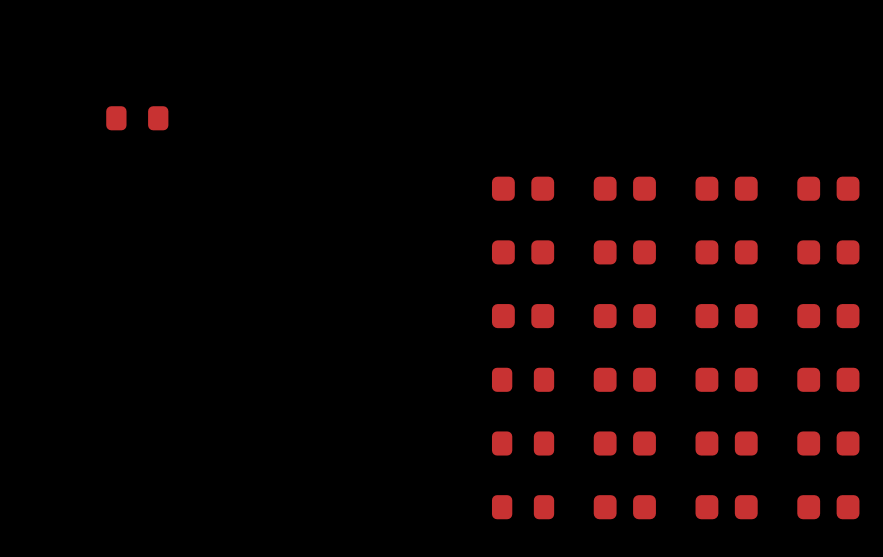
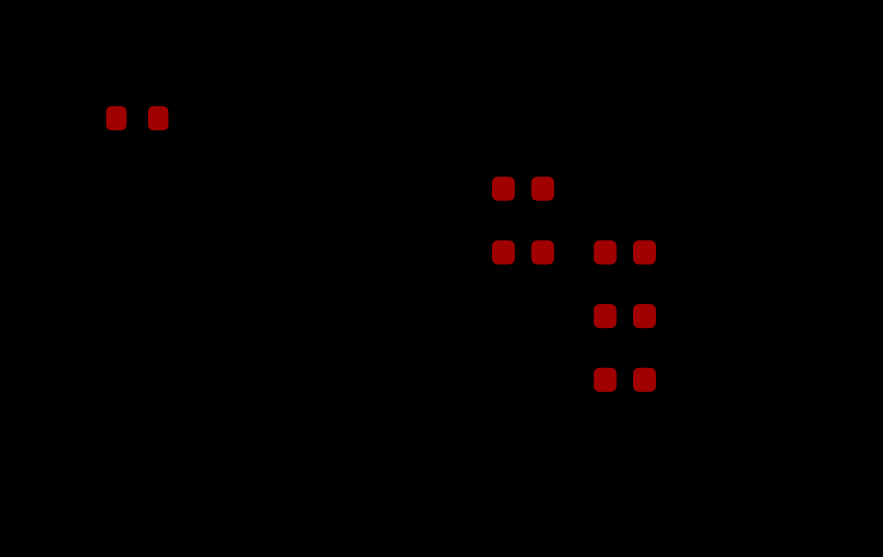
part: (624, 188) -> none
part: (726, 188) -> none
part: (828, 188) -> none
part: (726, 252) -> none
part: (828, 252) -> none
part: (523, 316) -> none
part: (726, 316) -> none
part: (828, 316) -> none
part: (523, 379) -> none
part: (726, 379) -> none
part: (828, 379) -> none
part: (523, 443) -> none
part: (624, 443) -> none
part: (726, 443) -> none
part: (828, 443) -> none
part: (523, 507) -> none
part: (624, 507) -> none
part: (726, 507) -> none
part: (828, 507) -> none

